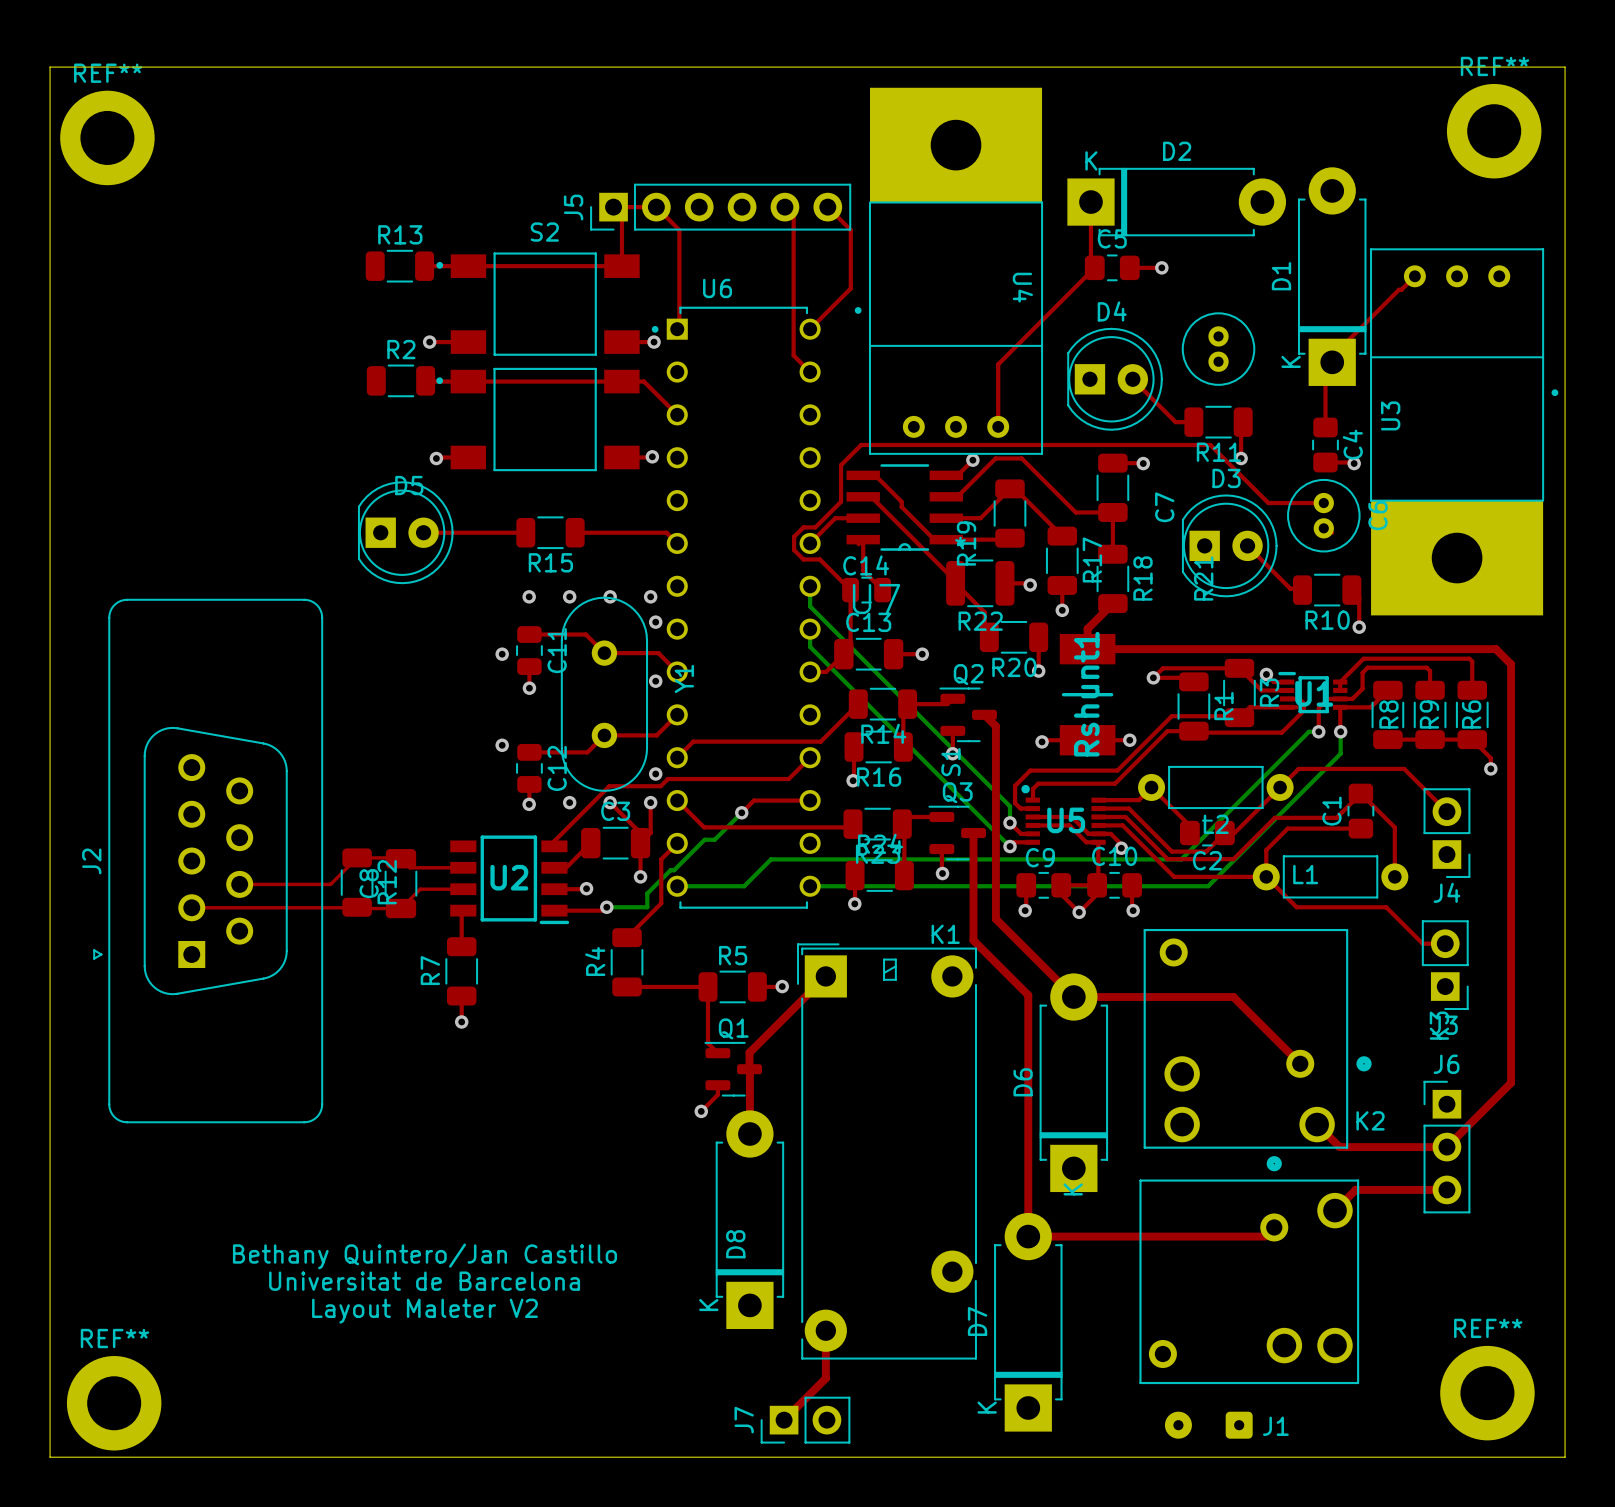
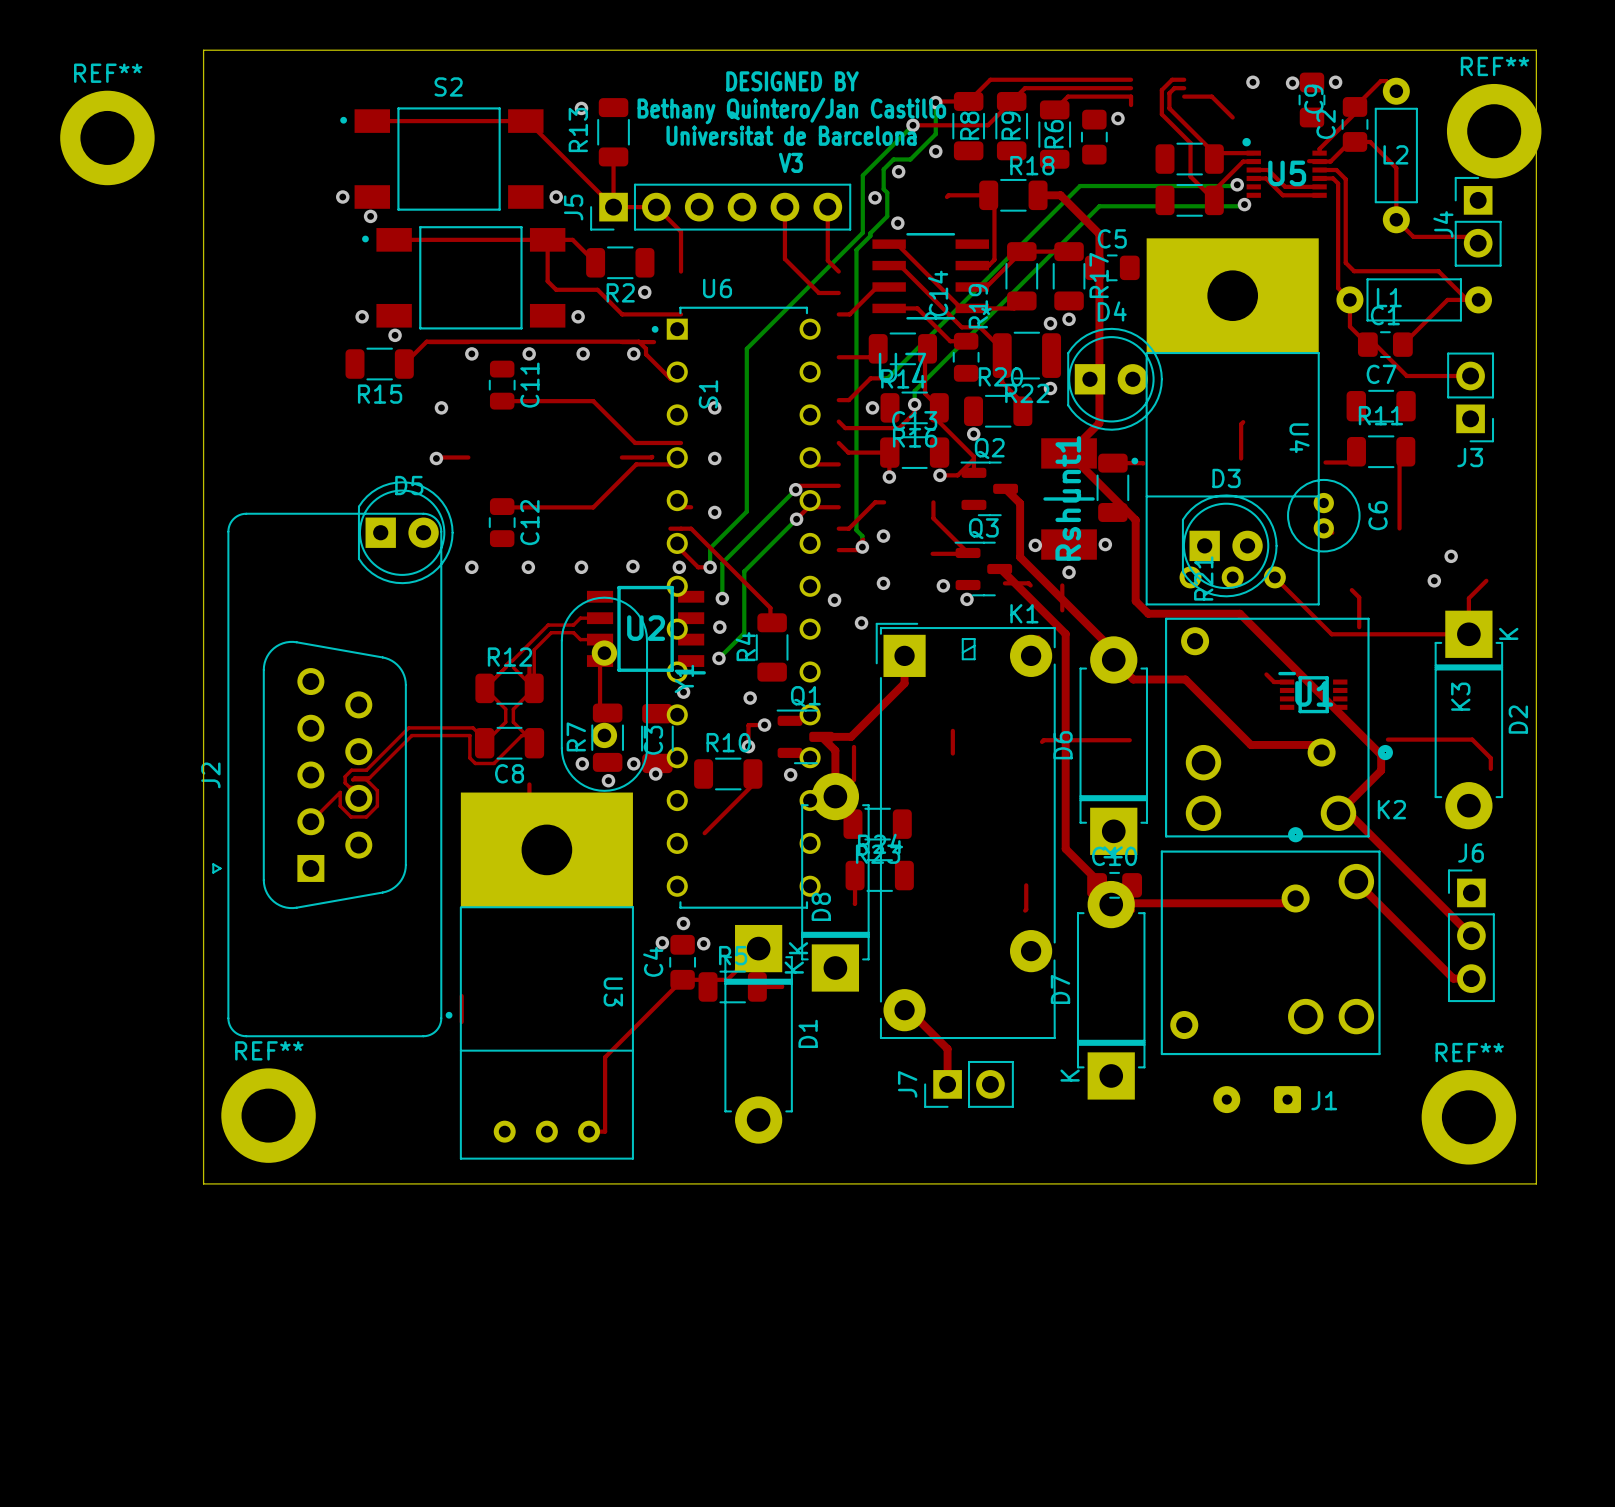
board edge: (50, 67) (1565, 67) (1565, 1457) (50, 1457) (50, 67) -> (203, 50) (203, 1183) (1536, 1183) (1536, 50) (203, 50)
top track: none -> (1131, 79) (990, 79) (968, 101) (935, 102)
top track: none -> (1184, 79) (1172, 79) (1161, 90) (1161, 114) (1190, 143) (1190, 176) (1214, 200) (1214, 190) (1243, 161) (1253, 161)
text: none -> DESIGNED BY (792, 81)
via: none -> (1252, 82)
via: none -> (1335, 82)
via: none -> (1292, 83)
top track: none -> (1131, 88) (1024, 88) (987, 125) (912, 125)
top track: none -> (1184, 88) (1174, 88) (1169, 93) (1169, 108) (1214, 153) (1214, 159) (1220, 153) (1253, 153)
top track: none -> (1396, 91) (1386, 81) (1380, 81) (1355, 106) (1355, 113) (1319, 148) (1319, 153)
top track: none -> (1184, 96) (1211, 96) (1232, 117)
bottom track: none -> (935, 102) (935, 134) (910, 159) (893, 159) (883, 169) (883, 189) (887, 192) (887, 216) (856, 249) (856, 530) (862, 536) (862, 547)
via: none -> (935, 102)
top track: none -> (1131, 105) (1131, 96) (1067, 96) (1054, 109)
via: none -> (581, 108)
text: none -> Bethany Quintero/Jan Castillo (791, 110)
via: none -> (1117, 118)
top track: none -> (372, 121) (527, 121) (613, 207) (613, 156)
bottom track: none -> (912, 125) (862, 175) (862, 232) (746, 348) (746, 511) (710, 548) (710, 567)
via: none -> (912, 125)
text: none -> Universitat de Barcelona (791, 135)
part: none -> (1094, 137)
via: none -> (935, 151)
part: none -> (1189, 159)
top track: none -> (1309, 161) (1330, 161) (1350, 141) (1370, 141) (1396, 168) (1396, 219) (1413, 236) (1471, 236) (1478, 243)
text: none -> V3 (790, 162)
top track: none -> (1253, 170) (1268, 170) (1285, 186) (1319, 186)
top track: none -> (1319, 170) (1336, 170) (1345, 179) (1345, 262) (1354, 271) (1438, 271) (1467, 299)
via: none -> (898, 171)
top track: none -> (1253, 178) (1266, 178) (1282, 195) (1319, 195)
top track: none -> (1319, 178) (1333, 178) (1338, 183) (1338, 288) (1349, 299) (1349, 326) (1367, 344) (1375, 344) (1406, 376) (1470, 376)
bottom track: none -> (1237, 184) (1080, 186) (887, 378) (882, 378)
via: none -> (1237, 184)
top track: none -> (1038, 195) (1060, 195) (1099, 234) (1099, 423) (1069, 453) (1135, 520) (1135, 601) (1148, 613) (1239, 613) (1381, 754) (1381, 770) (1338, 813) (1348, 813) (1471, 935)
via: none -> (342, 197)
via: none -> (556, 197)
via: none -> (875, 197)
top track: none -> (946, 197) (948, 195) (988, 195) (994, 201) (994, 259) (988, 265) (972, 265)
part: none -> (1189, 200)
top track: (1090, 202) (1090, 264) (1094, 267) (998, 364) (998, 426) -> none
D2 rotation: 0° (1176, 202) -> 90° clockwise (1468, 719)
D2 position: (1176, 202) -> (1468, 719)
bottom track: none -> (1244, 204) (1242, 206) (1099, 206) (914, 391) (914, 404)
via: none -> (1244, 204)
top track: (613, 207) (621, 215) (621, 266) (424, 266) -> none
top track: none -> (784, 207) (784, 259) (818, 292) (838, 292)
top track: (827, 207) (850, 230) (850, 288) (810, 329) -> (827, 207) (827, 260) (838, 271)
top track: (793, 215) (793, 355) (810, 372) -> none
via: none -> (370, 216)
via: none -> (897, 223)
top track: (679, 230) (679, 327) (677, 329) (668, 329) -> (679, 230) (681, 231) (681, 271)
R13 name position: R13 (400, 234) -> R13 (578, 129)
top track: none -> (394, 239) (572, 239) (595, 262)
top track: none -> (547, 239) (547, 281) (556, 289) (597, 289) (622, 314) (681, 314)
top track: none -> (889, 244) (897, 244) (961, 308) (1014, 308) (1021, 300)
top track: none -> (1069, 251) (1021, 251) (986, 287) (972, 287)
top track: none -> (889, 265) (900, 265) (961, 327) (980, 327) (1002, 349) (1002, 382) (1022, 403) (1022, 411)
R13 rotation: 0° (399, 266) -> 90° clockwise (613, 132)
R13 position: (399, 266) -> (613, 132)
top track: (1129, 267) (1161, 267) -> none
via: (1161, 267) -> none
U4 position: (948, 271) -> (1225, 421)
D1 rotation: 0° (1332, 276) -> 180° (758, 1034)
D1 position: (1332, 276) -> (758, 1034)
top track: (1414, 276) (1332, 356) (1332, 362) (1325, 369) (1325, 427) -> none
top track: none -> (889, 287) (877, 287) (849, 314) (838, 314)
via: none -> (644, 292)
top track: none -> (1478, 299) (1447, 299) (1402, 344)
S2 position: (538, 304) -> (441, 159)
top track: none -> (889, 308) (917, 308) (950, 341) (966, 341)
C7 footprint: [1181, 312, 1256, 386] -> [1346, 389, 1416, 423]
via: none -> (362, 316)
via: none -> (578, 316)
via: none -> (1069, 319)
via: none -> (1050, 323)
via: none -> (395, 335)
via: (429, 342) -> none
via: (654, 342) -> none
top track: none -> (878, 348) (869, 357) (838, 357)
R2 name position: R2 (401, 349) -> R2 (620, 292)
top track: none -> (932, 349) (927, 348) (925, 351) (925, 393) (939, 407) (939, 422) (973, 456) (973, 472)
via: none -> (471, 353)
via: none -> (529, 353)
via: none -> (583, 353)
via: none -> (633, 353)
top track: none -> (404, 364) (426, 341) (638, 341) (646, 348) (646, 354) (670, 378) (681, 378)
top track: none -> (882, 378) (870, 378) (848, 400) (838, 400)
top track: (1132, 379) (1175, 422) (1193, 422) -> none
R2 position: (400, 380) -> (620, 262)
top track: (425, 380) (643, 381) (677, 414) -> none
via: none -> (1050, 388)
top track: none -> (502, 401) (593, 401) (635, 442) (681, 442)
top track: none -> (914, 404) (914, 412) (899, 428) (845, 428) (838, 421)
via: none -> (914, 404)
via: none -> (441, 407)
via: none -> (714, 407)
via: none -> (872, 407)
S1 position: (537, 419) -> (463, 277)
R11 position: (1218, 422) -> (1381, 451)
U3 rotation: 0° (1464, 431) -> 180° (539, 976)
U3 position: (1464, 431) -> (539, 976)
via: none -> (973, 434)
top track: none -> (838, 442) (848, 452) (889, 452) (889, 477)
C4 name position: C4 (1352, 444) -> C4 (653, 961)
C4 position: (1325, 445) -> (682, 962)
top track: none -> (1405, 451) (1399, 458) (1399, 528)
R11 name position: R11 (1218, 452) -> R11 (1380, 415)
via: (652, 456) -> none
via: none -> (714, 458)
via: (1241, 458) -> none
via: (972, 460) -> none
via: (1143, 463) -> none
via: (1354, 463) -> none
top track: none -> (681, 464) (636, 464) (593, 507) (502, 506)
top track: none -> (808, 464) (838, 464)
top track: (863, 475) (875, 475) (901, 501) (901, 506) (934, 539) (1010, 538) -> none
via: none -> (939, 475)
via: none -> (889, 477)
top track: none -> (838, 485) (799, 485) (795, 489)
top track: none -> (1005, 488) (1020, 503) (1020, 557) (1113, 650) (1113, 659) (1133, 679) (1185, 679) (1250, 744) (1314, 744) (1321, 752)
bottom track: none -> (795, 489) (722, 563) (722, 598)
via: none -> (795, 489)
top track: (871, 496) (984, 612) (984, 632) (989, 637) -> none
top track: (957, 496) (995, 458) (1021, 458) (1075, 512) (1112, 512) (1112, 554) -> none
top track: none -> (884, 502) (875, 502) (848, 528) (838, 528)
top track: none -> (933, 502) (933, 518) (968, 552) (932, 553)
top track: (1323, 503) (1268, 503) (1210, 445) (861, 445) (841, 465) (841, 501) (815, 527) (803, 527) (794, 536) (794, 550) (803, 559) (819, 559) (850, 590) (850, 647) (826, 671) (810, 671) (810, 669) -> none
top track: none -> (681, 507) (691, 507)
top track: none -> (838, 507) (808, 507) (796, 519)
U7 position: (904, 507) -> (930, 276)
C7 name position: C7 (1164, 507) -> C7 (1381, 374)
via: none -> (714, 512)
R19 position: (1010, 513) -> (1021, 276)
top track: (863, 518) (835, 518) (810, 543) -> none
top track: (934, 518) (980, 518) (1010, 488) (1015, 488) (1062, 536) -> none
bottom track: none -> (796, 519) (744, 571) (744, 633) (718, 658)
via: none -> (796, 519)
top track: none -> (670, 528) (691, 528) (770, 607) (772, 622)
top track: (423, 532) (525, 532) -> none
R15 position: (550, 532) -> (379, 364)
top track: (575, 532) (666, 532) (677, 543) -> none
via: none -> (883, 536)
top track: (851, 539) (863, 539) (863, 570) (882, 590) -> none
via: none -> (1105, 544)
via: none -> (1035, 545)
top track: (1247, 545) (1290, 588) (1302, 590) -> none
top track: none -> (862, 547) (859, 550) (838, 550)
via: none -> (862, 547)
top track: none -> (681, 550) (698, 567) (710, 567)
via: none -> (1451, 556)
R17 position: (1062, 560) -> (1069, 276)
C14 name position: C14 (866, 565) -> C14 (938, 293)
via: none -> (632, 566)
via: none -> (471, 567)
via: none -> (528, 567)
via: none -> (581, 567)
via: none -> (679, 567)
via: none -> (710, 567)
top track: none -> (999, 569) (1065, 633) (1065, 848) (1111, 894) (1111, 904) (1290, 903) (1295, 898)
via: none -> (1069, 572)
top track: none -> (1274, 577) (1331, 634) (1468, 634) (1468, 598) (1486, 580)
R18 rotation: 0° (1112, 578) -> 90° clockwise (1013, 195)
R18 position: (1112, 578) -> (1013, 195)
via: none -> (1434, 580)
via: none -> (883, 583)
R22 position: (980, 583) -> (1026, 355)
via: none -> (943, 585)
via: (1030, 585) -> none
bottom track: (810, 586) (810, 606) (1010, 806) (1010, 822) -> none
C14 rotation: 0° (866, 590) -> 90° clockwise (966, 357)
C14 position: (866, 590) -> (966, 357)
R10 position: (1327, 590) -> (728, 773)
via: (529, 596) -> none
via: (569, 596) -> none
via: (610, 596) -> none
via: (650, 596) -> none
via: none -> (722, 598)
via: none -> (966, 599)
via: none -> (834, 600)
top track: (1116, 606) (1112, 603) (1087, 628) (1087, 649) (1495, 649) (1511, 664) (1511, 1082) (1446, 1147) (1339, 1147) (1317, 1124) -> none
via: (1062, 610) -> none
top track: none -> (600, 618) (580, 618) (573, 625) (548, 625) (506, 664) (484, 688) (505, 709) (505, 722) (484, 743) (477, 743) (477, 732) (473, 727) (408, 727) (366, 770) (351, 770) (345, 776) (345, 782) (349, 787) (358, 787) (358, 798)
R10 name position: R10 (1327, 620) -> R10 (728, 742)
via: (655, 622) -> none
via: none -> (861, 622)
via: none -> (719, 627)
via: (1359, 627) -> none
bottom track: (810, 629) (810, 646) (1009, 846) -> none
top track: (529, 634) (585, 634) (604, 653) (658, 653) (677, 671) -> none
R20 position: (1014, 637) -> (998, 411)
top track: none -> (600, 639) (580, 639) (573, 632) (551, 632) (534, 649) (534, 688)
C11 position: (529, 650) -> (502, 385)
via: (502, 654) -> none
C13 position: (868, 654) -> (914, 452)
top track: (893, 654) (922, 654) -> none
via: (922, 654) -> none
top track: none -> (904, 655) (904, 683) (851, 736) (821, 736) (835, 750) (835, 796)
via: none -> (718, 658)
top track: (1232, 660) (1261, 690) (1287, 690) -> none
top track: none -> (603, 661) (600, 661) (600, 705) (607, 713) (611, 709)
top track: none -> (513, 667) (534, 688)
R20 name position: R20 (1014, 667) -> R20 (1000, 376)
via: (1038, 671) -> none
top track: (1239, 671) (1239, 668) (1162, 668) (1153, 677) (1189, 677) (1193, 681) -> none
via: (1266, 674) -> none
via: (1153, 677) -> none
via: (655, 681) -> none
via: (529, 688) -> none
top track: none -> (534, 688) (513, 709) (513, 722) (534, 743)
top track: (1387, 690) (1370, 707) (1340, 707) (1340, 731) -> none
top track: (1430, 690) (1430, 671) (1426, 667) (1367, 667) (1362, 672) (1362, 688) (1352, 698) (1328, 698) (1318, 708) (1318, 731) -> none
top track: (1472, 690) (1472, 661) (1469, 658) (1363, 658) (1340, 682) (1340, 690) -> none
via: none -> (683, 692)
R3: (1239, 693) -> none
Rshunt1 position: (1087, 694) -> (1069, 498)
via: none -> (750, 698)
top track: (952, 698) (947, 704) (907, 704) (903, 708) (903, 746) -> none
top track: (1287, 698) (1299, 698) (1303, 703) (1303, 710) (1281, 732) (1167, 731) (1115, 783) (1038, 783) (1033, 788) (1033, 800) -> none
top track: (858, 704) (820, 741) (693, 741) (677, 757) -> none
R14 position: (882, 704) -> (902, 348)
R1: (1193, 706) -> none
top track: (1296, 707) (1249, 707) (1239, 717) (1171, 716) (1117, 770) (1030, 770) (1015, 785) (1015, 803) (1020, 808) (1033, 808) -> none
top track: (677, 714) (656, 735) (604, 735) (587, 752) (529, 752) -> none
Q2 position: (968, 714) -> (989, 488)
top track: (984, 714) (995, 726) (995, 919) (1073, 997) (1233, 997) (1300, 1063) -> none
R8 position: (1387, 714) -> (968, 126)
R9 position: (1430, 714) -> (1011, 126)
R6 position: (1472, 714) -> (1054, 134)
top track: none -> (764, 725) (748, 725) (748, 746)
via: none -> (764, 725)
bottom track: (1318, 731) (1308, 731) (1181, 859) (771, 859) (744, 886) (677, 886) -> none
via: (1318, 731) -> none
bottom track: (1340, 731) (1340, 753) (1208, 886) (810, 886) -> none
via: (1340, 731) -> none
top track: none -> (526, 735) (521, 735) (494, 763) (475, 763) (469, 758) (469, 735) (411, 735) (369, 777) (354, 777) (352, 779) (366, 779) (377, 790) (377, 806) (366, 816) (351, 816) (340, 806) (340, 792) (310, 821)
via: (1129, 740) -> none
via: (1042, 741) -> none
via: (502, 745) -> none
via: none -> (748, 746)
R16 position: (878, 746) -> (914, 407)
via: (952, 753) -> none
top track: (810, 757) (788, 779) (667, 779) (660, 786) (609, 786) (554, 841) (554, 846) (561, 846) -> none
S1 name position: S1 (951, 762) -> S1 (708, 394)
via: none -> (582, 763)
via: none -> (633, 763)
C12 position: (529, 768) -> (502, 522)
via: (1490, 768) -> none
top track: none -> (752, 773) (752, 784) (704, 833)
via: none -> (790, 774)
via: none -> (608, 780)
via: (853, 780) -> none
L2 rotation: 0° (1215, 787) -> 90° clockwise (1396, 155)
L2 position: (1215, 787) -> (1396, 155)
top track: (677, 800) (704, 827) (849, 827) (852, 824) -> none
top track: (810, 800) (753, 800) (741, 812) -> none
top track: (1098, 800) (1138, 800) (1151, 787) (1189, 825) (1189, 833) -> none
via: (569, 802) -> none
top track: (610, 802) (640, 833) (640, 876) -> none
via: (610, 802) -> none
top track: (650, 802) (650, 833) (640, 843) -> none
via: (650, 802) -> none
via: (529, 804) -> none
top track: (1098, 808) (1128, 808) (1171, 851) (1206, 851) (1224, 833) (1234, 833) (1298, 768) (1404, 768) (1446, 811) -> none
C1 rotation: 0° (1360, 811) -> 90° clockwise (1385, 344)
C1 position: (1360, 811) -> (1385, 344)
bottom track: (741, 812) (714, 839) (704, 839) (647, 893) (647, 907) (606, 907) -> none
via: (741, 812) -> none
U5 position: (1063, 814) -> (1284, 167)
top track: (941, 817) (909, 817) (902, 824) (904, 826) (904, 875) -> none
top track: (1032, 817) (1071, 817) (1088, 833) (1110, 833) (1121, 844) (1121, 848) -> none
top track: (1098, 817) (1125, 817) (1167, 859) (1233, 859) (1274, 817) (1336, 817) (1360, 793) (1394, 827) (1394, 876) -> none
top track: (1010, 822) (1020, 833) (1033, 833) -> none
via: (1010, 822) -> none
L2 name position: L2 (1216, 824) -> L2 (1395, 154)
top track: (1032, 825) (1069, 825) (1086, 842) (1098, 842) -> none
top track: (1098, 825) (1122, 825) (1174, 876) (1266, 876) -> none
top track: (1360, 828) (1287, 828) (1266, 850) (1266, 876) -> none
Q3 position: (957, 833) -> (983, 569)
C2 rotation: 0° (1207, 833) -> 90° clockwise (1355, 124)
C2 position: (1207, 833) -> (1355, 124)
J4 rotation: 0° (1446, 833) -> 180° (1478, 221)
J4 position: (1446, 833) -> (1478, 221)
top track: (974, 834) (973, 940) (1028, 995) (1028, 1236) -> none
top track: (1033, 842) (1014, 842) (1010, 846) -> none
top track: (1098, 842) (1097, 885) -> none
top track: (590, 843) (566, 867) (554, 867) -> none
C3 rotation: 0° (615, 843) -> 90° clockwise (657, 738)
C3 position: (615, 843) -> (657, 738)
top track: (677, 843) (661, 859) (661, 903) (627, 937) -> none
via: (1010, 846) -> none
via: (1121, 848) -> none
top track: (941, 849) (942, 873) -> none
J2 position: (208, 861) -> (327, 774)
top track: (463, 867) (409, 867) (400, 857) (357, 857) (330, 884) (239, 884) -> none
via: (942, 873) -> none
via: (640, 876) -> none
top track: (1266, 876) (1296, 907) (1386, 907) (1422, 943) (1445, 943) -> none
L1 position: (1330, 876) -> (1414, 299)
U2 position: (509, 879) -> (646, 630)
top track: none -> (1358, 879) (1356, 881) (1453, 978) (1471, 978)
R12 rotation: 0° (357, 882) -> 90° clockwise (509, 688)
R12 position: (357, 882) -> (509, 688)
R12 name position: R12 (387, 882) -> R12 (509, 657)
C8 name position: C8 (369, 883) -> C8 (509, 773)
C8 rotation: 0° (400, 883) -> 90° clockwise (509, 743)
C8 position: (400, 883) -> (509, 743)
C9 rotation: 0° (1043, 885) -> 90° clockwise (1311, 99)
C9 position: (1043, 885) -> (1311, 99)
top track: (1097, 885) (1061, 885) (1061, 894) (1079, 912) (1097, 894) (1097, 885) -> none
via: (586, 888) -> none
top track: (470, 889) (420, 889) (400, 908) (191, 907) -> none
J4 name position: J4 (1446, 892) -> J4 (1443, 224)
via: (854, 903) -> none
top track: (606, 907) (603, 910) (554, 910) -> none
via: (606, 907) -> none
top track: (463, 910) (461, 912) (461, 946) -> none
via: (1025, 910) -> none
via: (1133, 910) -> none
via: (1079, 912) -> none
via: none -> (683, 923)
via: none -> (662, 942)
via: none -> (703, 943)
top track: none -> (758, 948) (727, 979) (682, 979) (605, 1057) (605, 1131) (589, 1131)
R4 name position: R4 (595, 961) -> R4 (745, 646)
R4 position: (627, 962) -> (772, 647)
J3 position: (1445, 965) -> (1470, 397)
R7 position: (461, 971) -> (607, 737)
top track: (825, 976) (749, 1052) (749, 1134) -> none
top track: (627, 986) (708, 986) -> none
top track: (708, 986) (708, 1043) (717, 1053) -> none
via: (782, 986) -> none
top track: none -> (904, 1010) (908, 1010) (947, 1048) (947, 1084)
via: (461, 1021) -> none
K2 position: (1257, 1038) -> (1278, 727)
Q1 position: (733, 1069) -> (805, 736)
D6 position: (1073, 1082) -> (1113, 745)
top track: (717, 1085) (717, 1094) (701, 1111) -> none
via: (701, 1111) -> none
J6 position: (1446, 1147) -> (1471, 935)
K1 position: (887, 1151) -> (965, 830)
top track: (1446, 1189) (1355, 1189) (1335, 1210) -> none
D8 position: (749, 1219) -> (835, 882)
top track: (1274, 1227) (1265, 1236) (1028, 1236) -> none
text: Bethany Quintero/Jan Castillo (424, 1256) -> none
K3 position: (1249, 1270) -> (1270, 941)
text: Universitat de Barcelona (424, 1281) -> none
text: Layout Maleter V2 (424, 1311) -> none
D7 position: (1028, 1322) -> (1111, 990)
top track: (825, 1330) (825, 1378) (784, 1420) -> none
REF** position: (1487, 1393) -> (1468, 1117)
REF** position: (114, 1403) -> (268, 1115)
J7 position: (805, 1420) -> (969, 1084)
J1 position: (1208, 1425) -> (1257, 1099)

